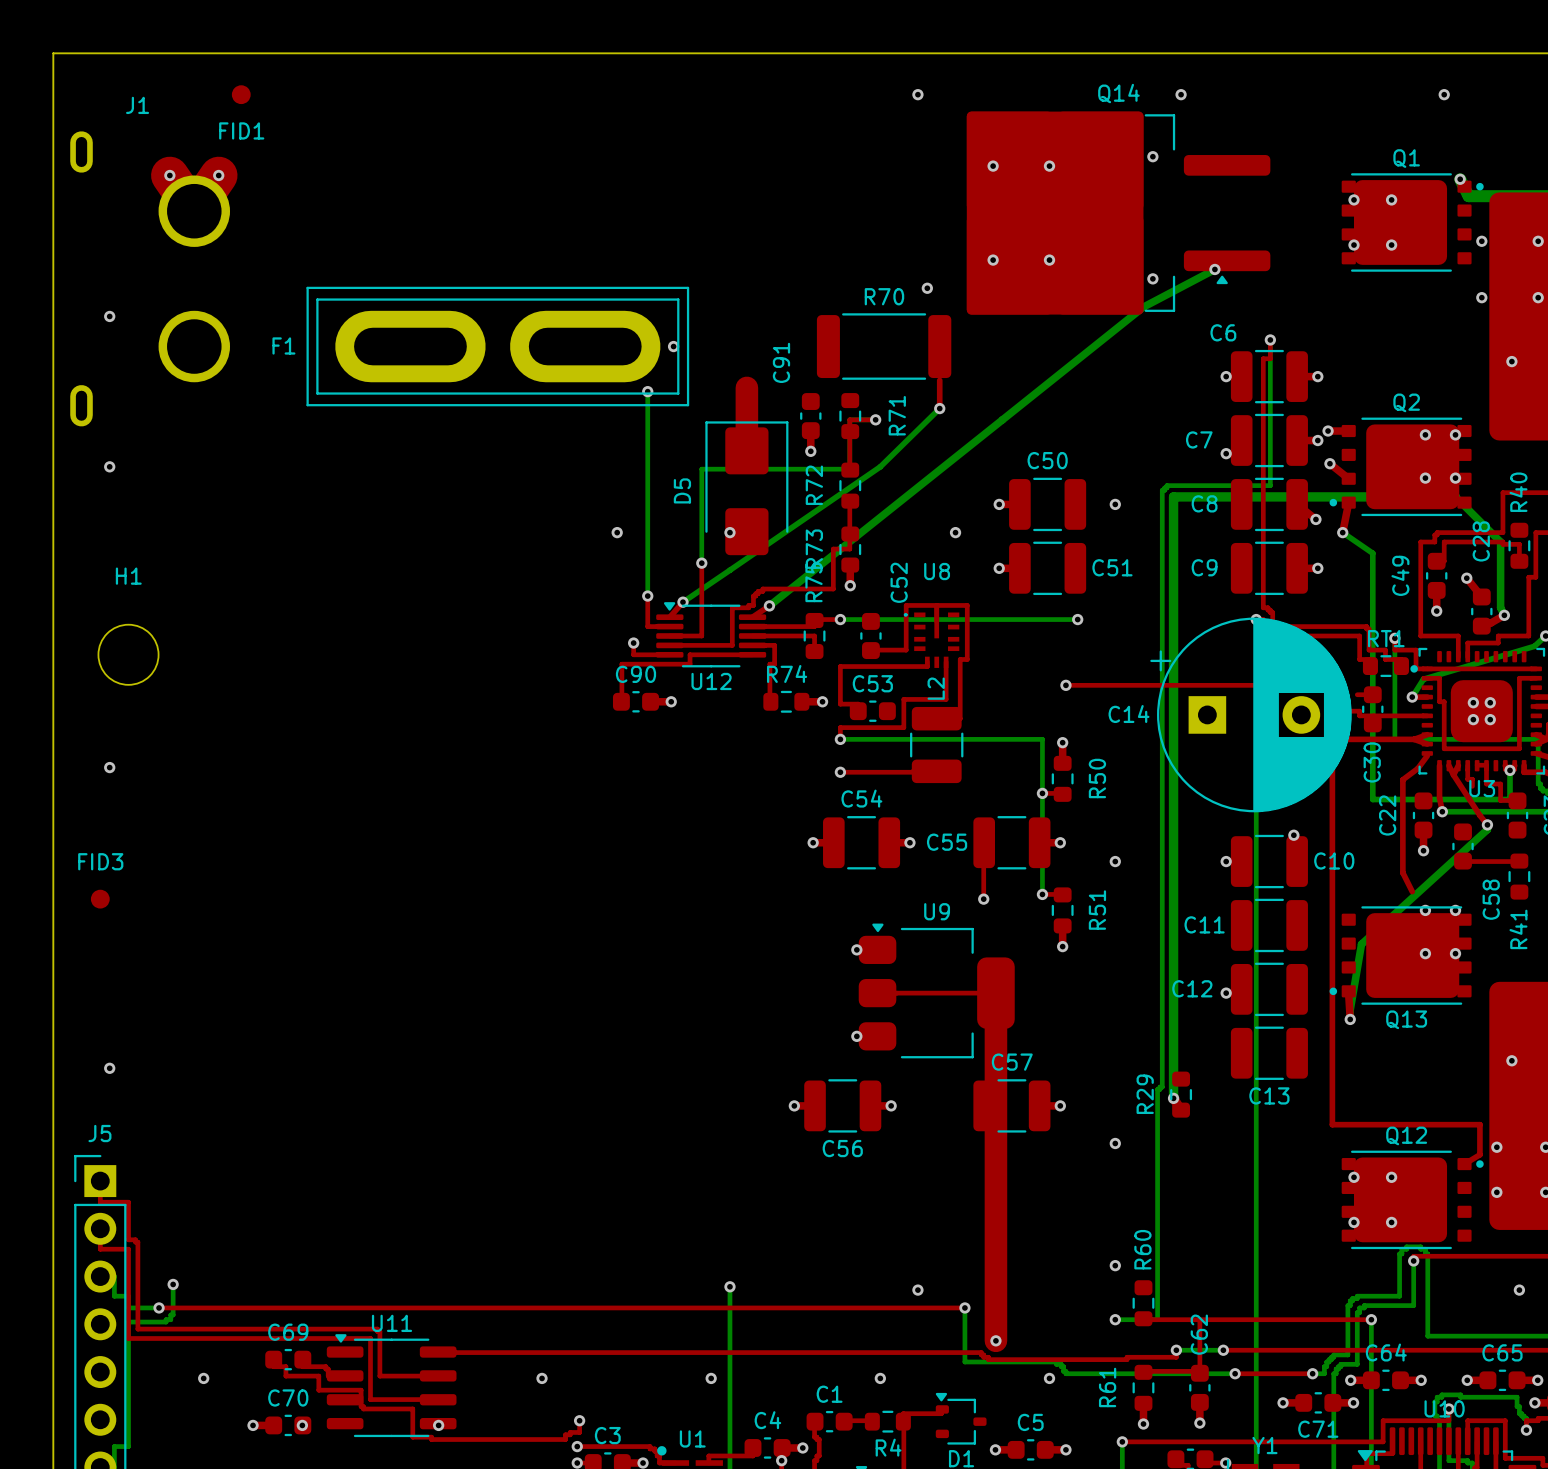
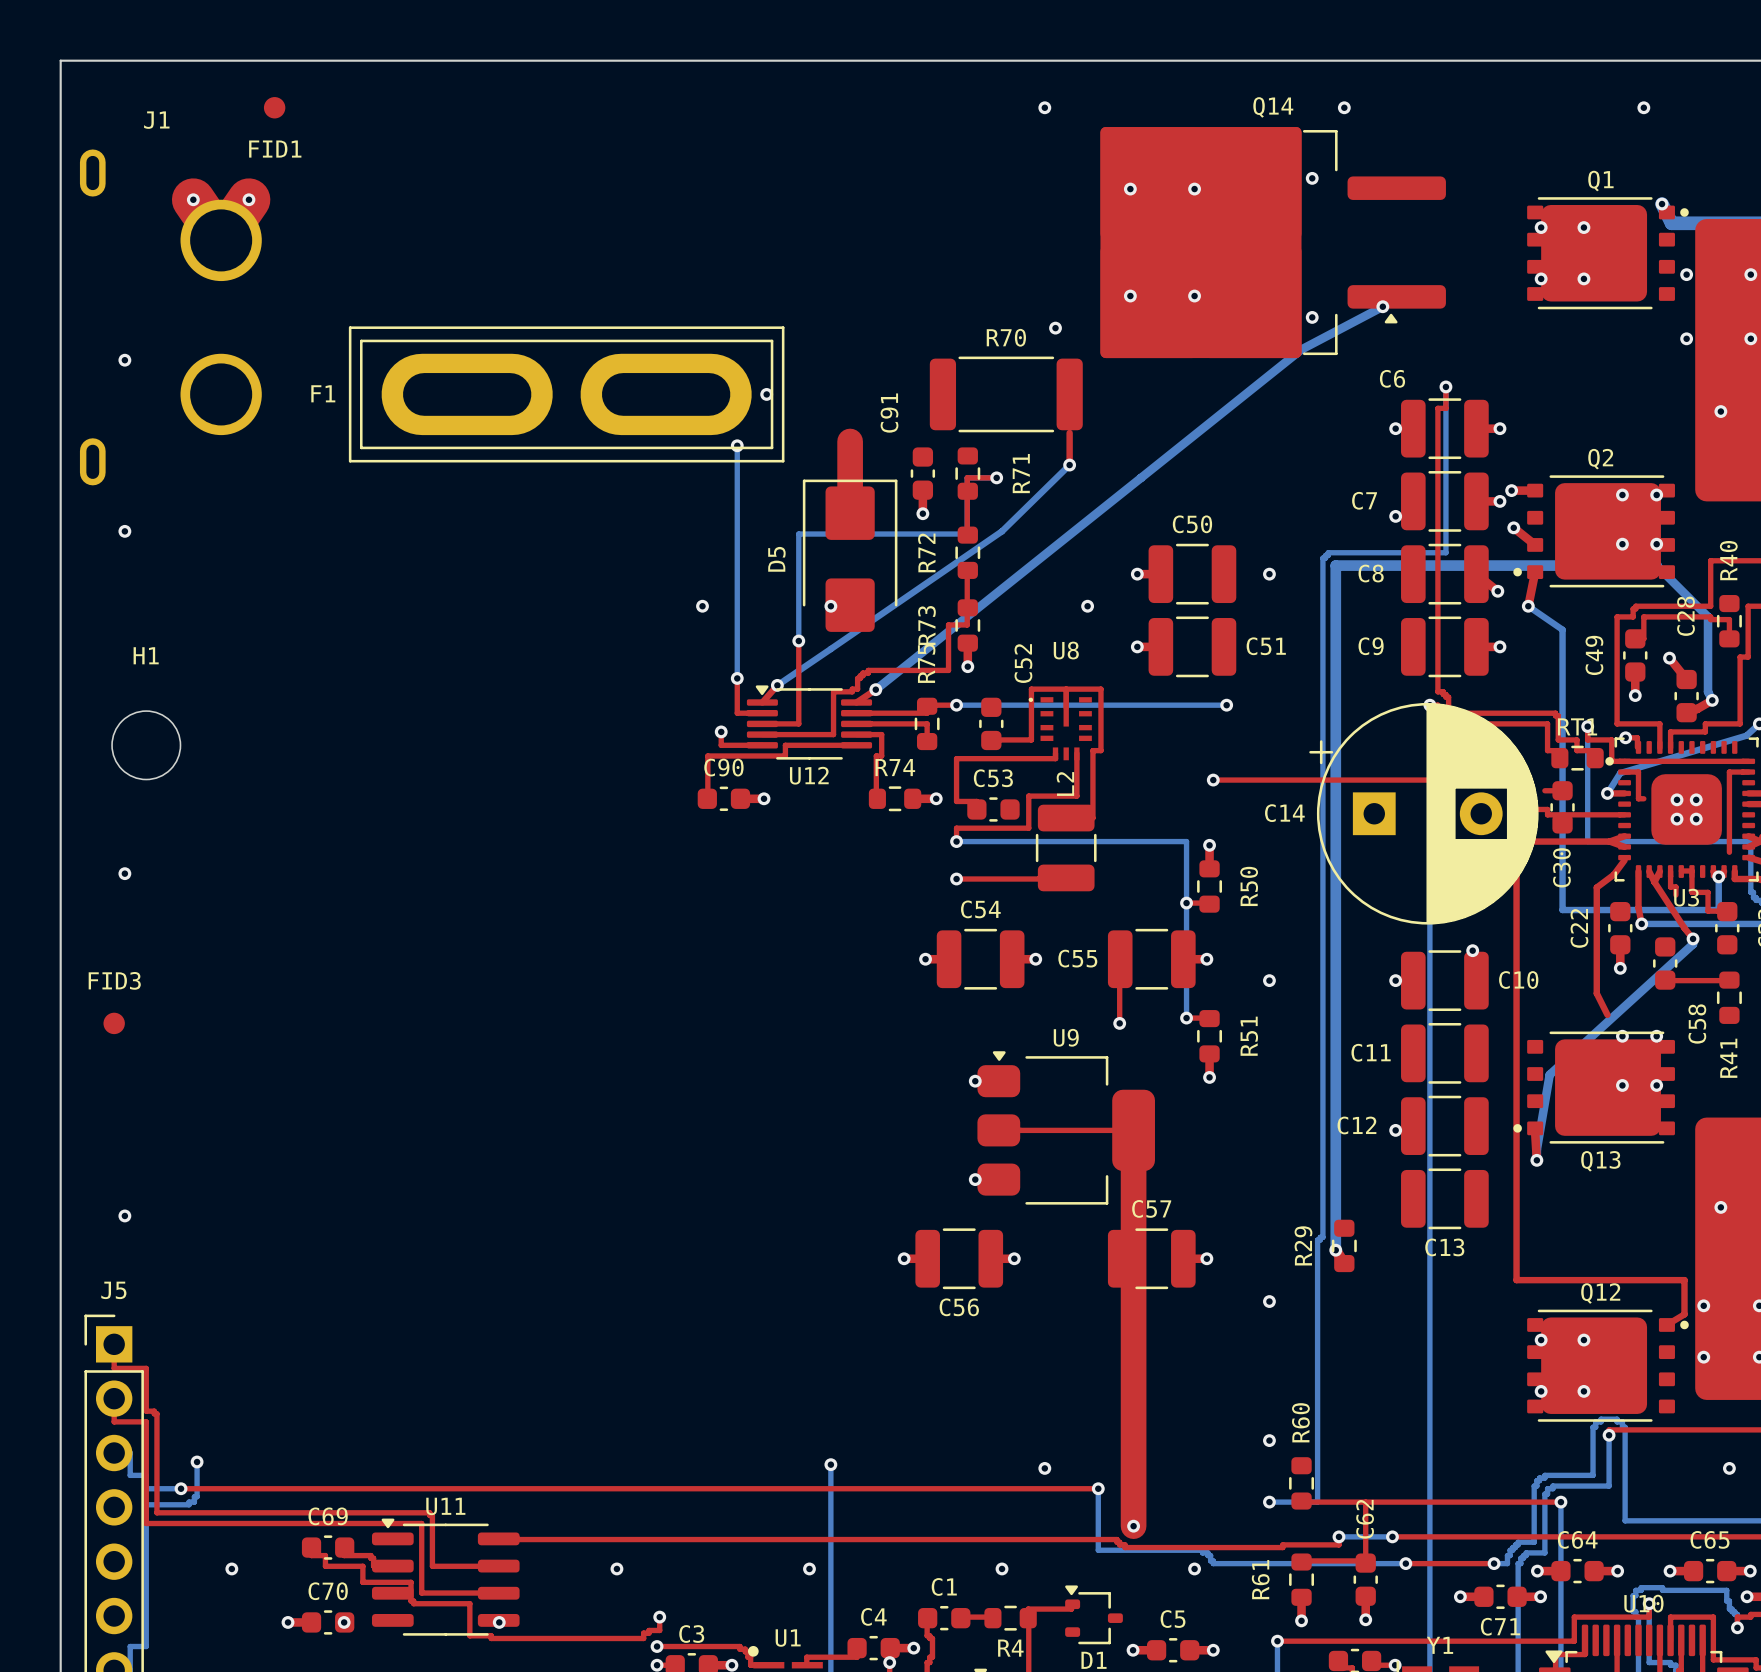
top track: none -> (1625, 737) (1637, 737) (1637, 747)
via: none -> (1625, 737)
top track: (1444, 701) (1444, 748) (1519, 748) -> none

